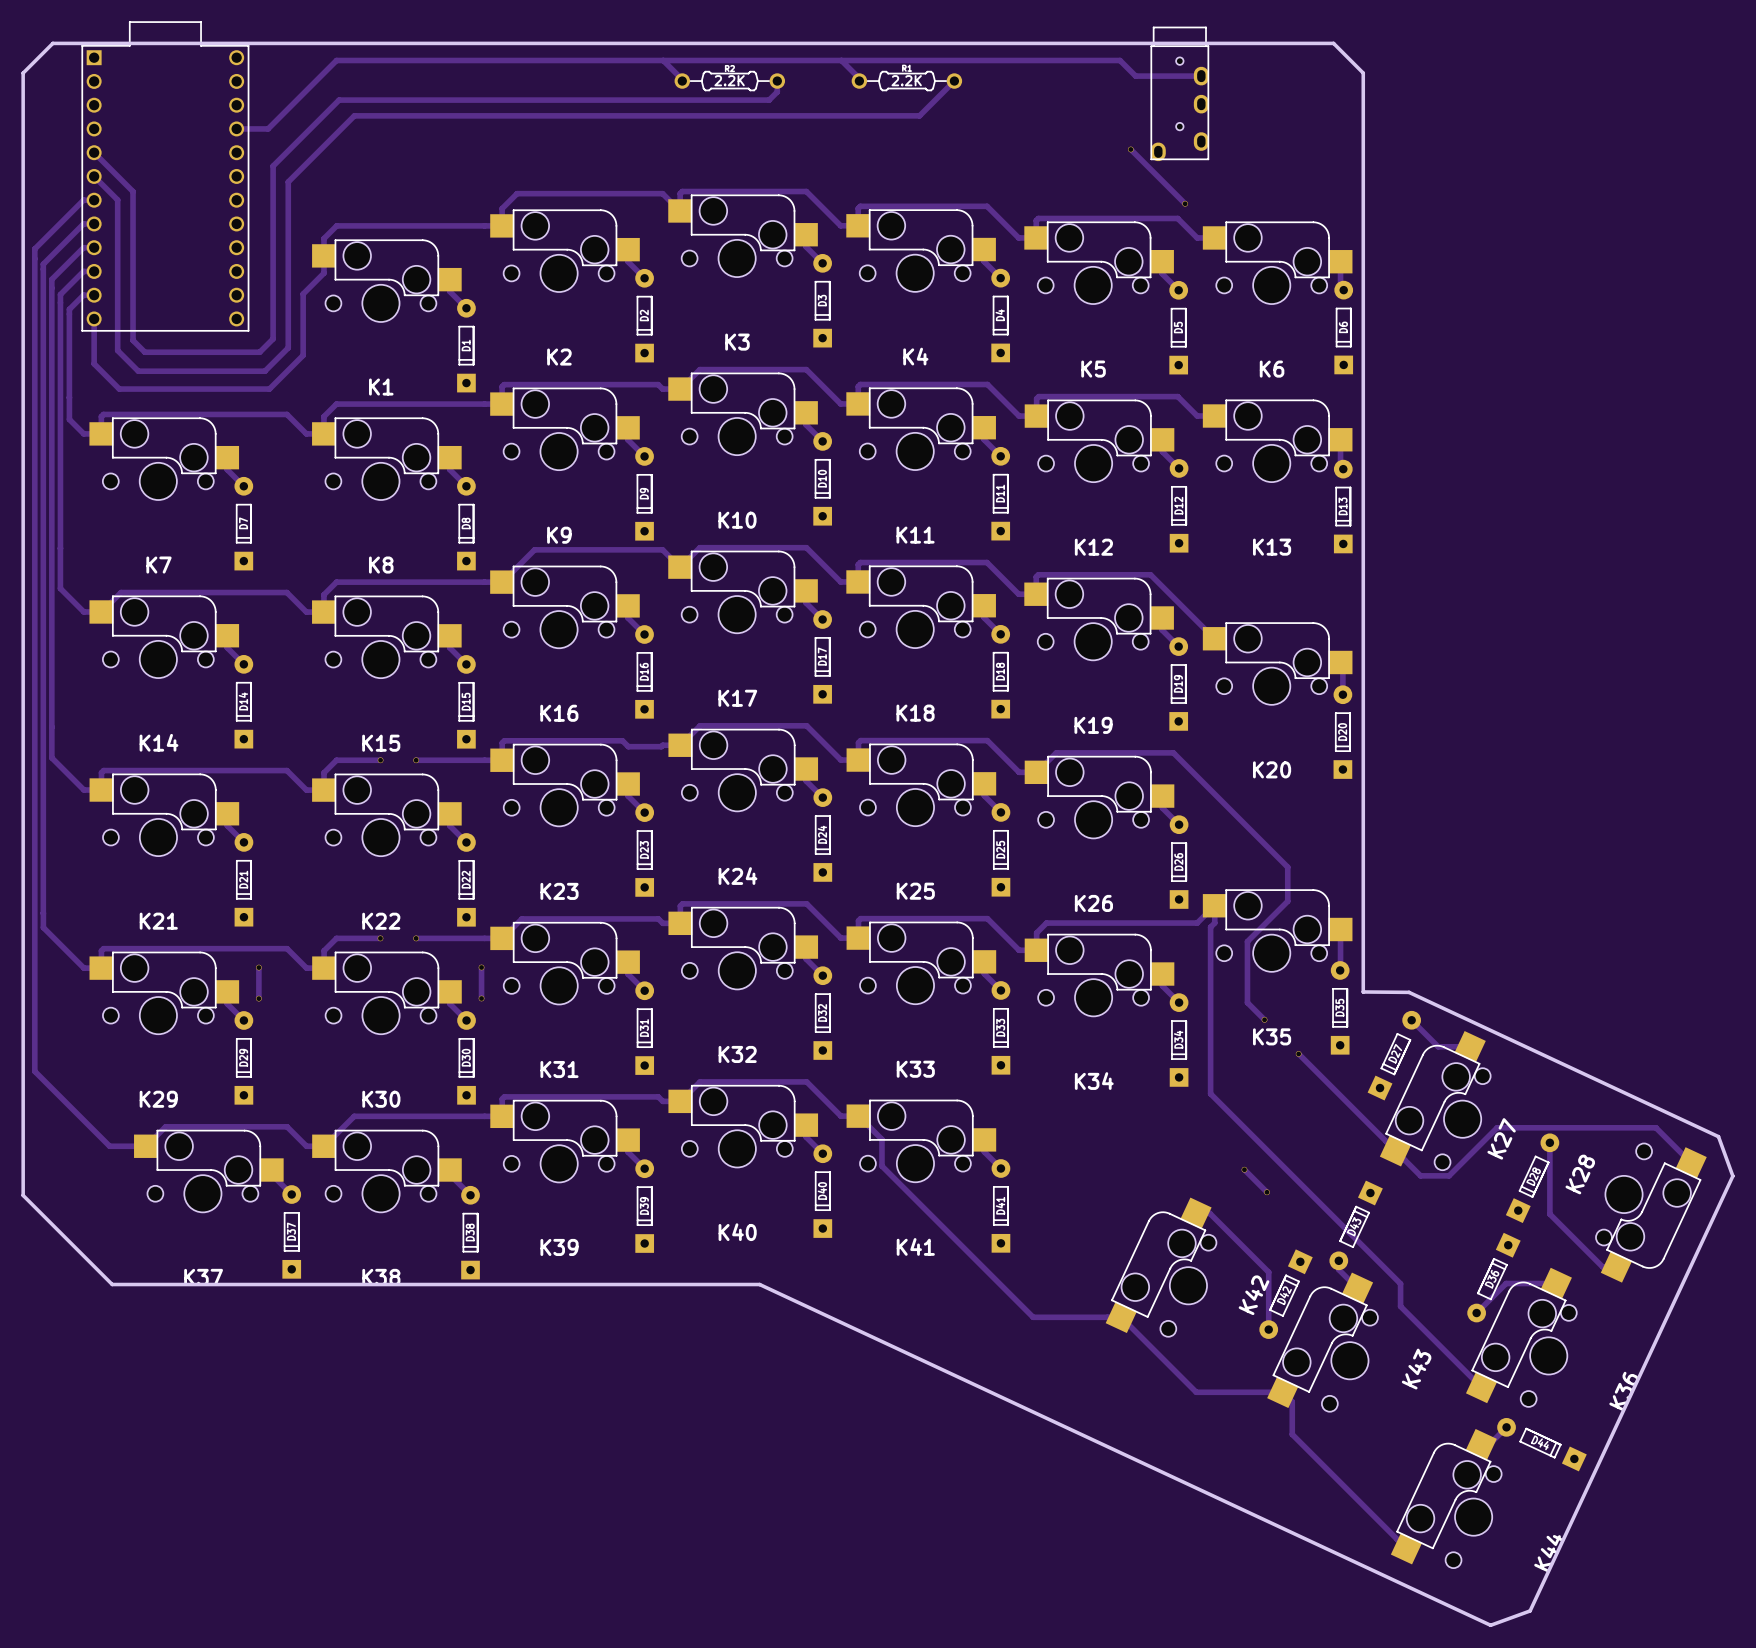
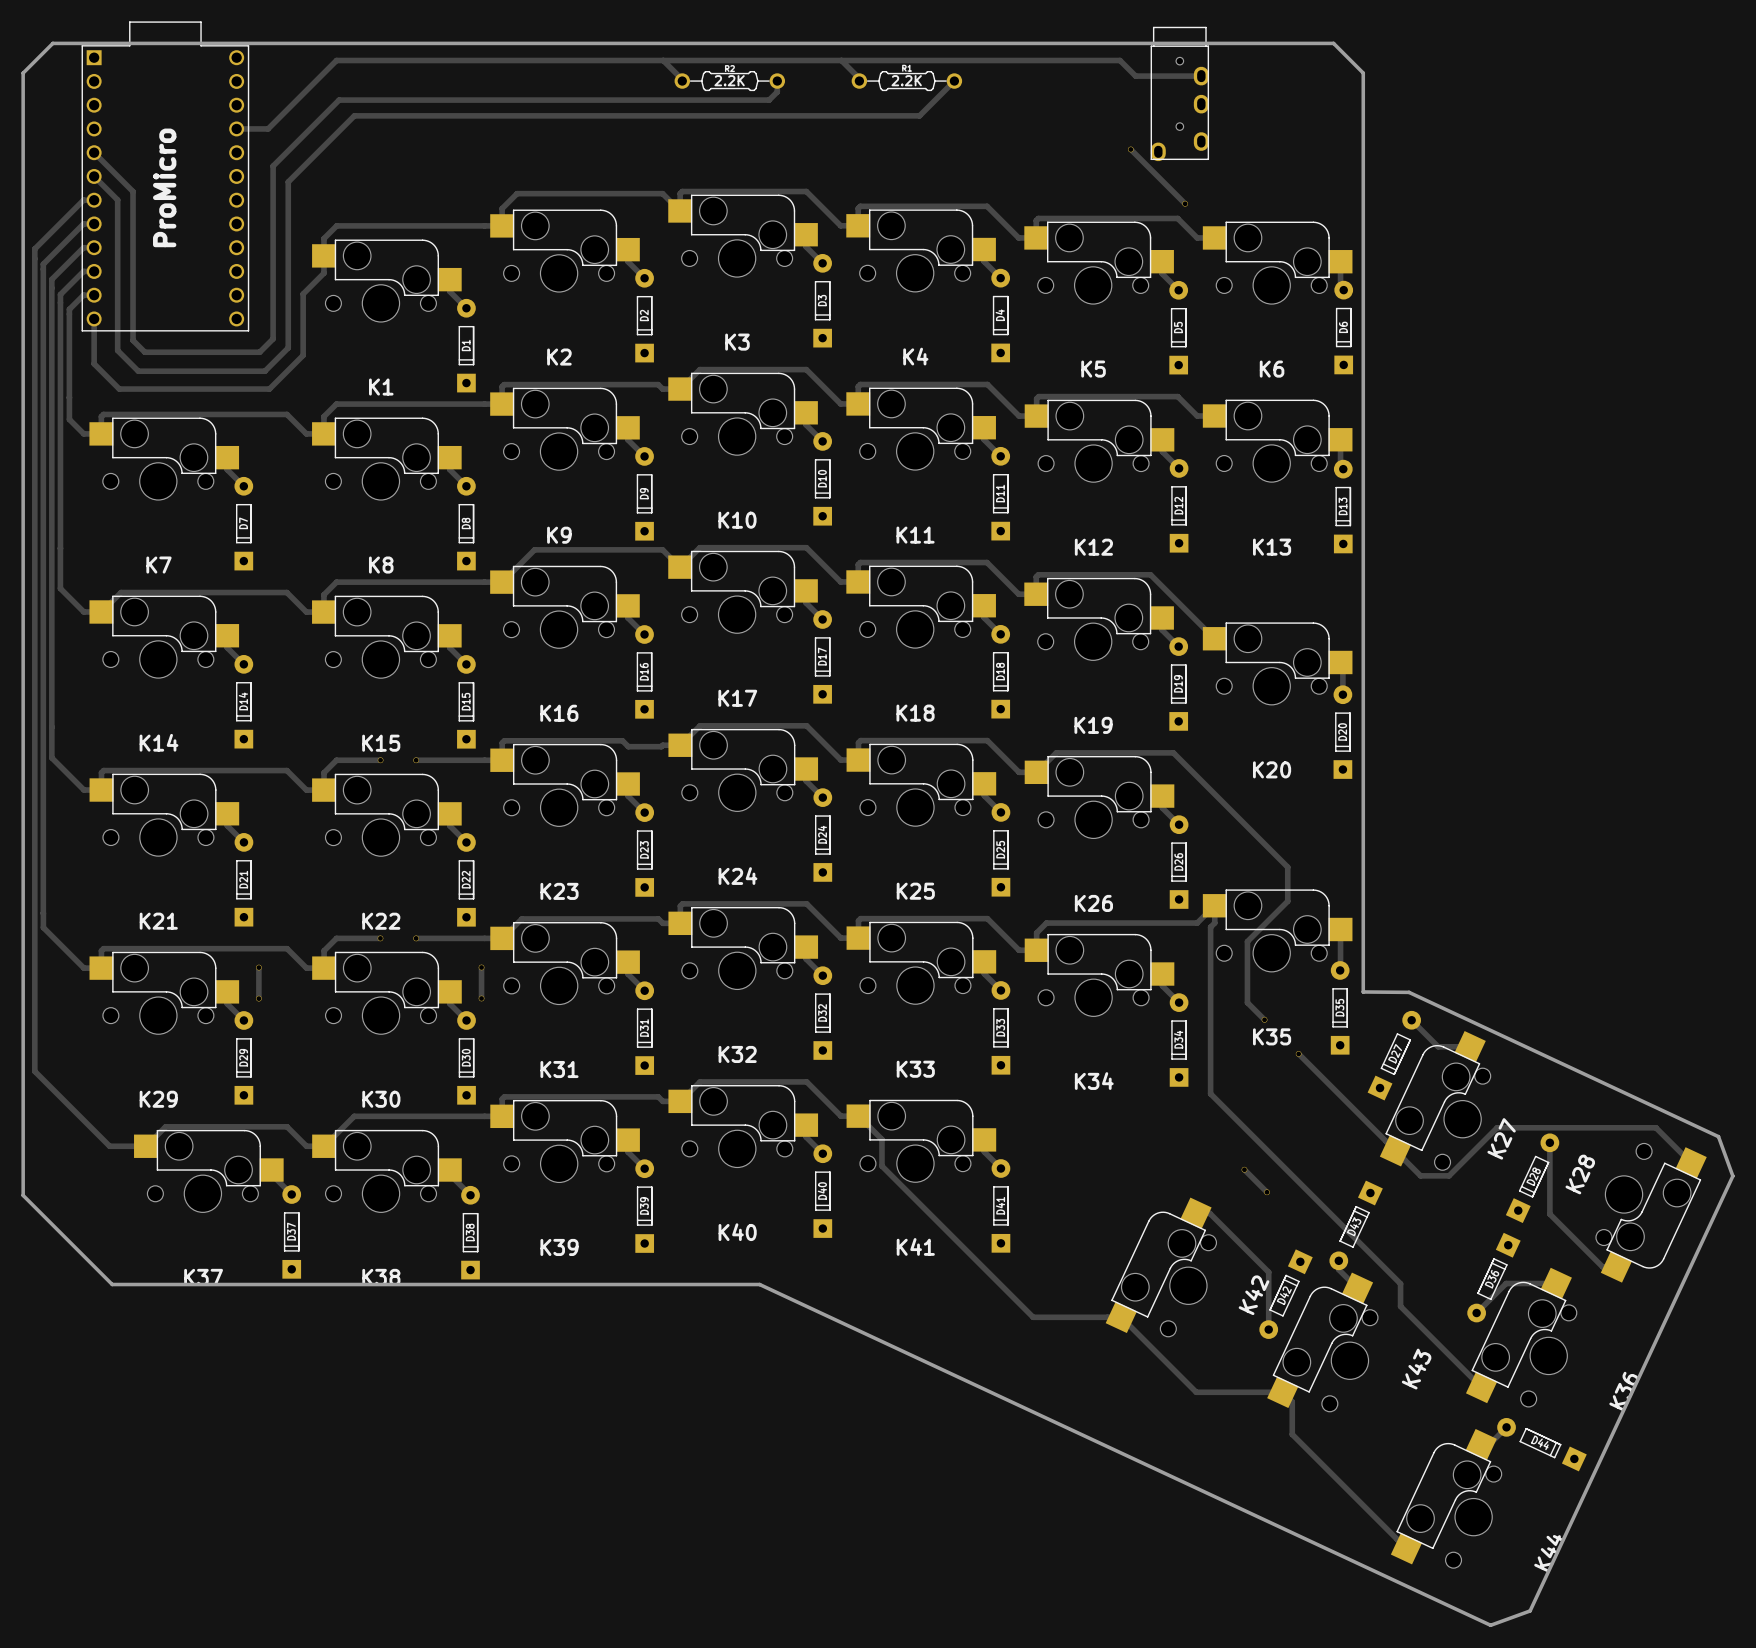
part value: none -> ProMicro (164, 187)

